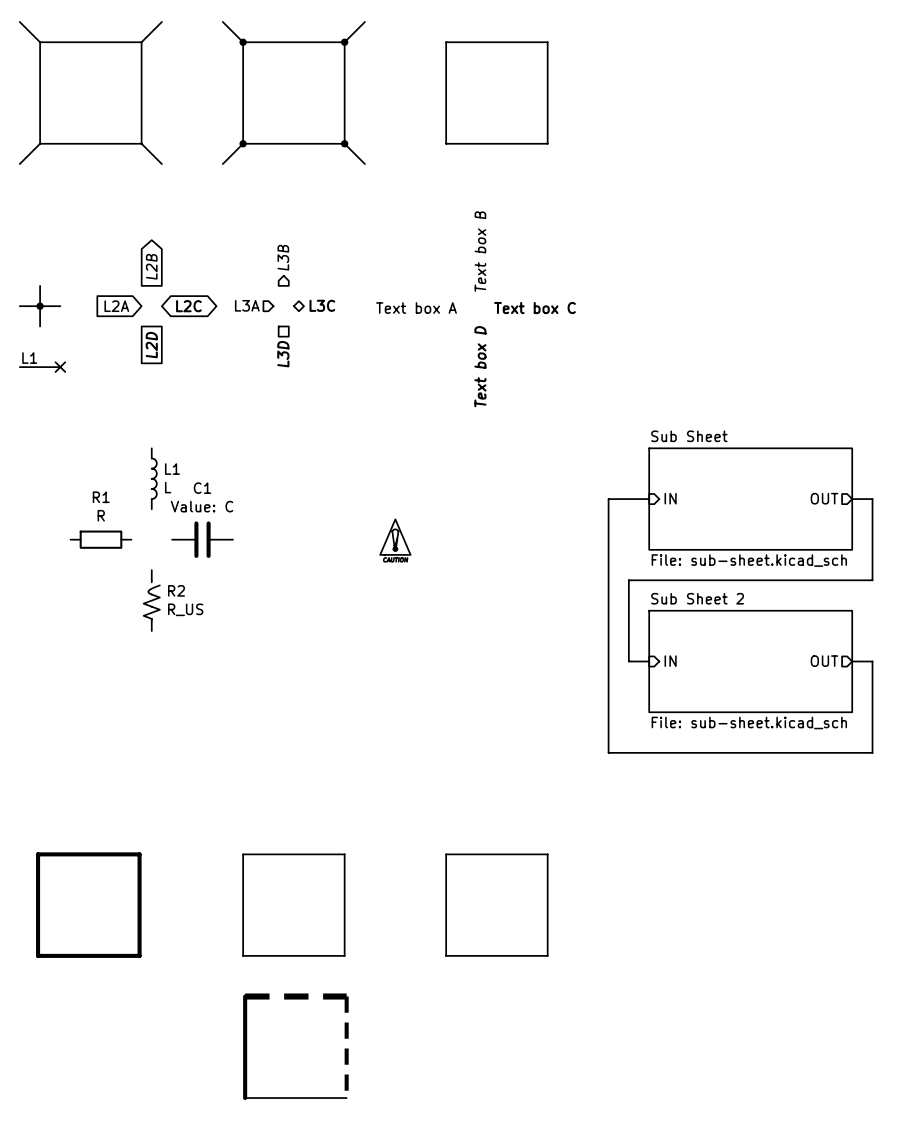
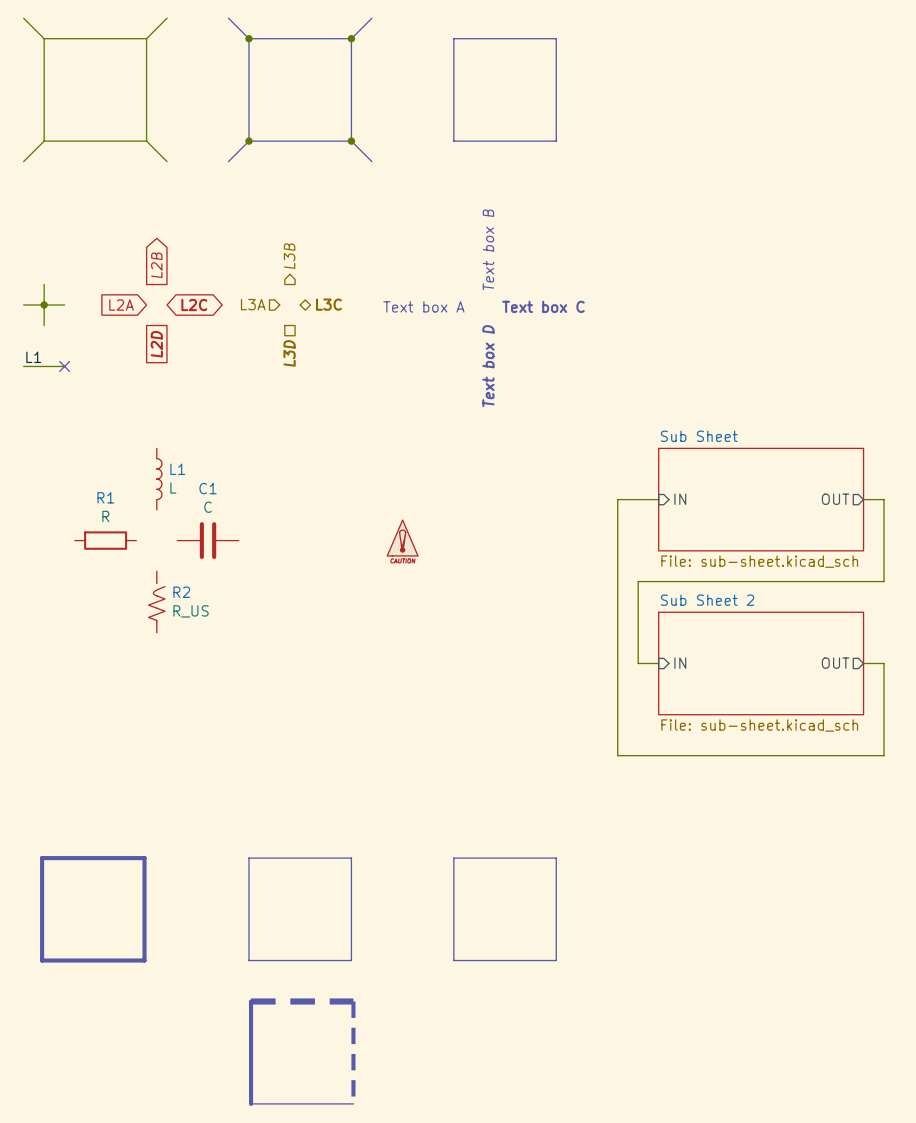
C1 value: Value: C (202, 506) -> C (208, 507)

